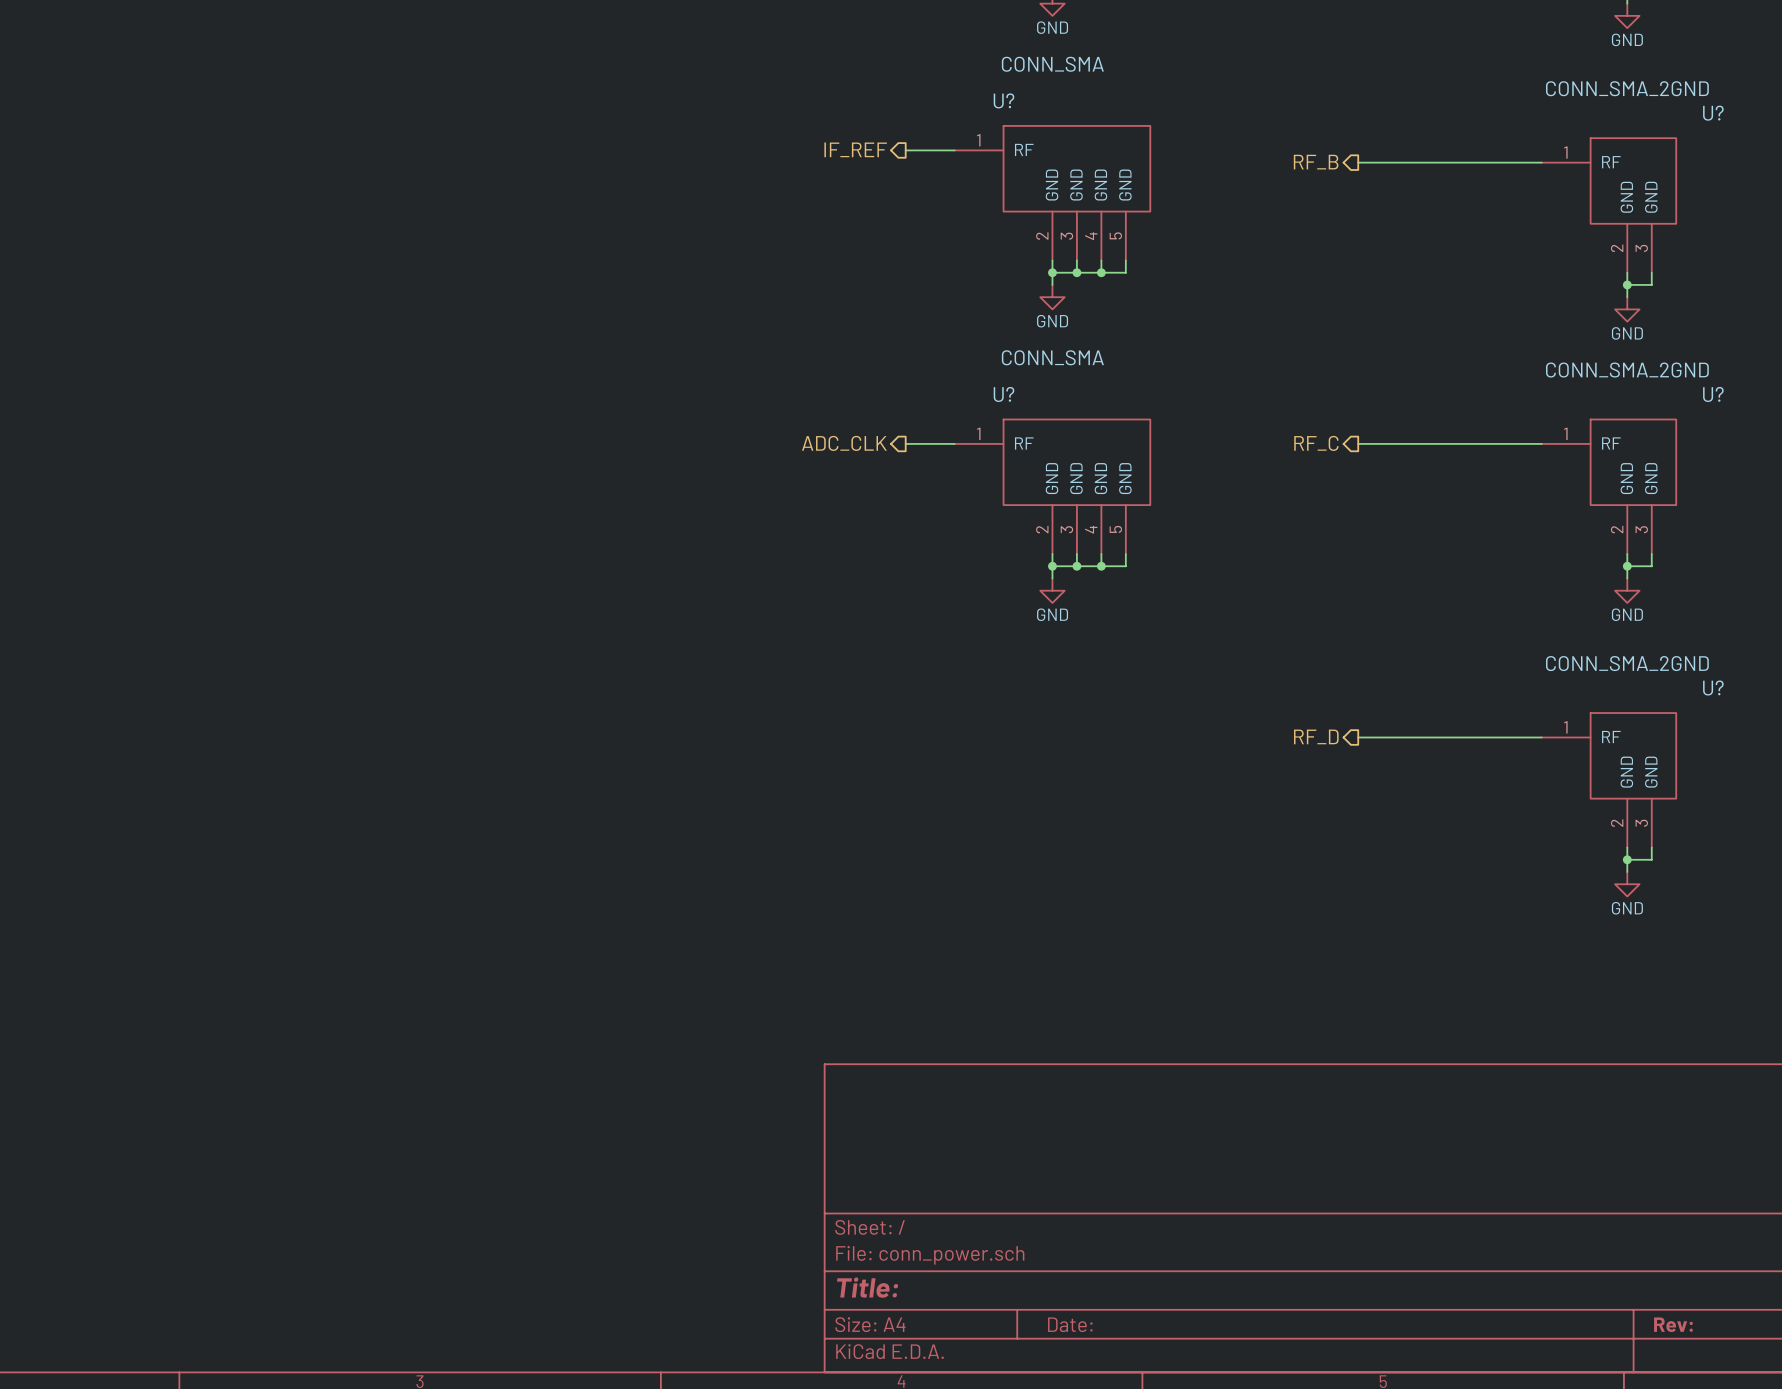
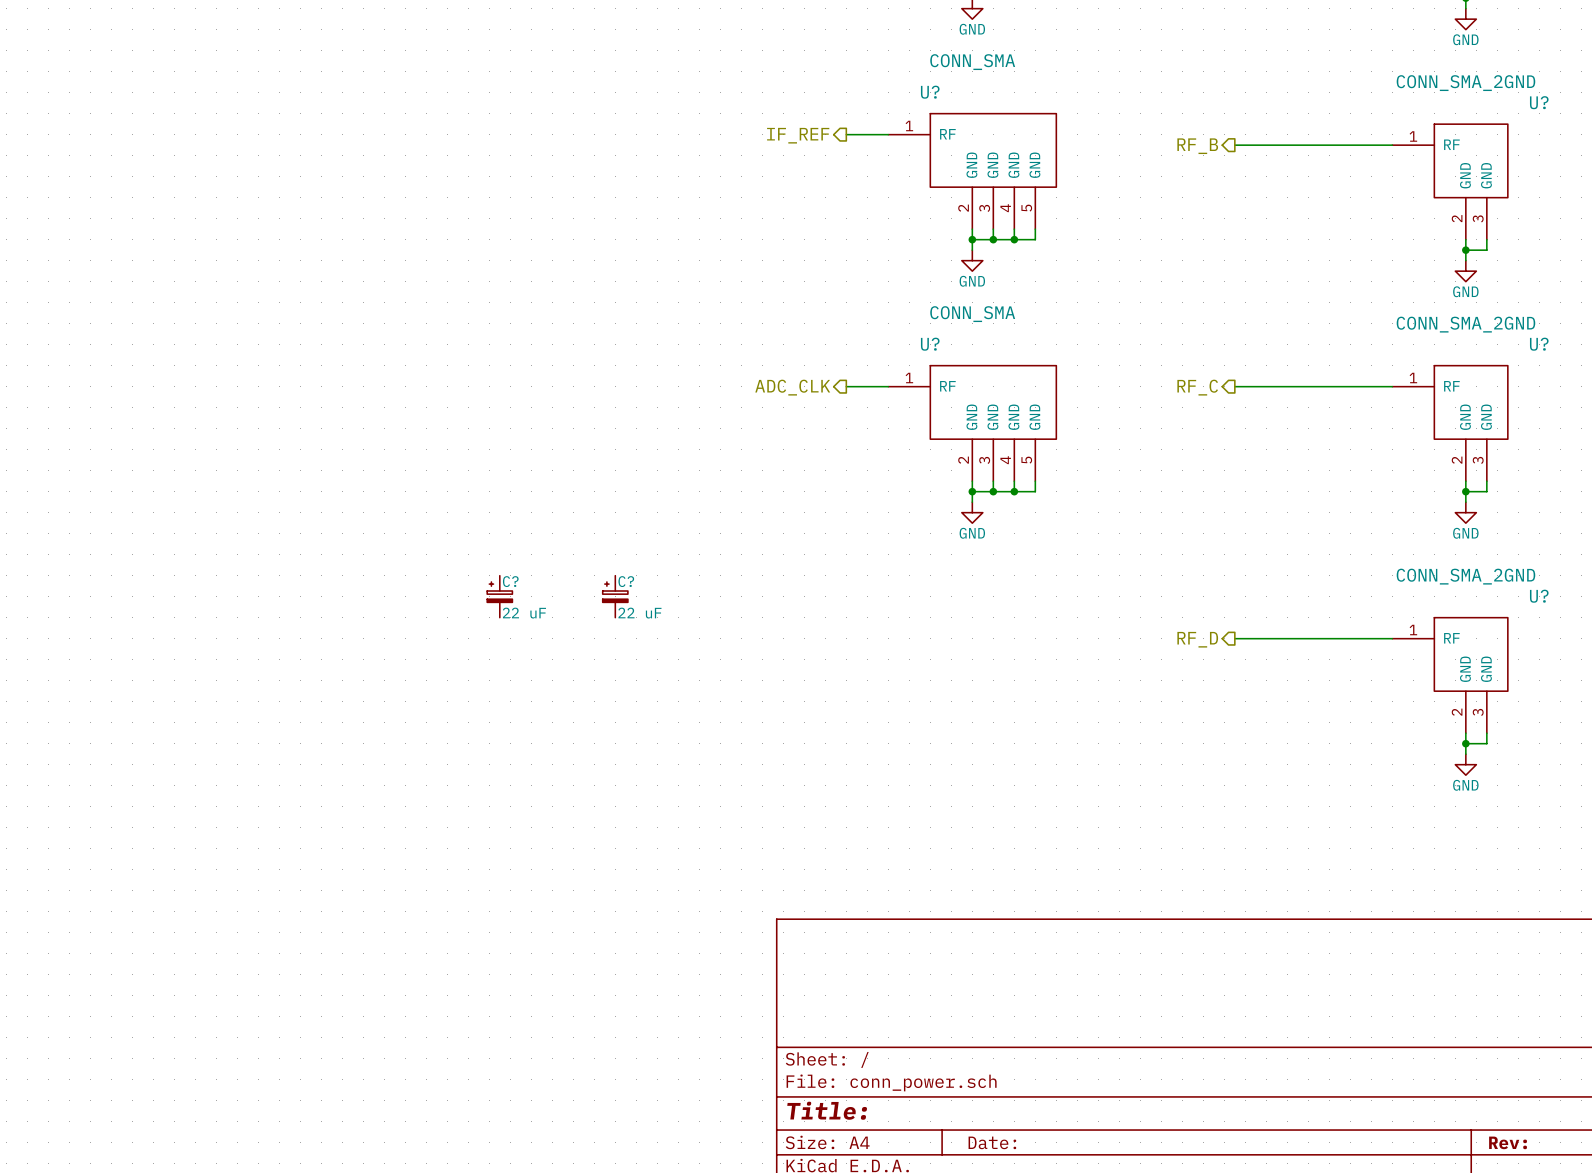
C?: none -> 22 uF (499, 596)
C?: none -> 22 uF (615, 596)

